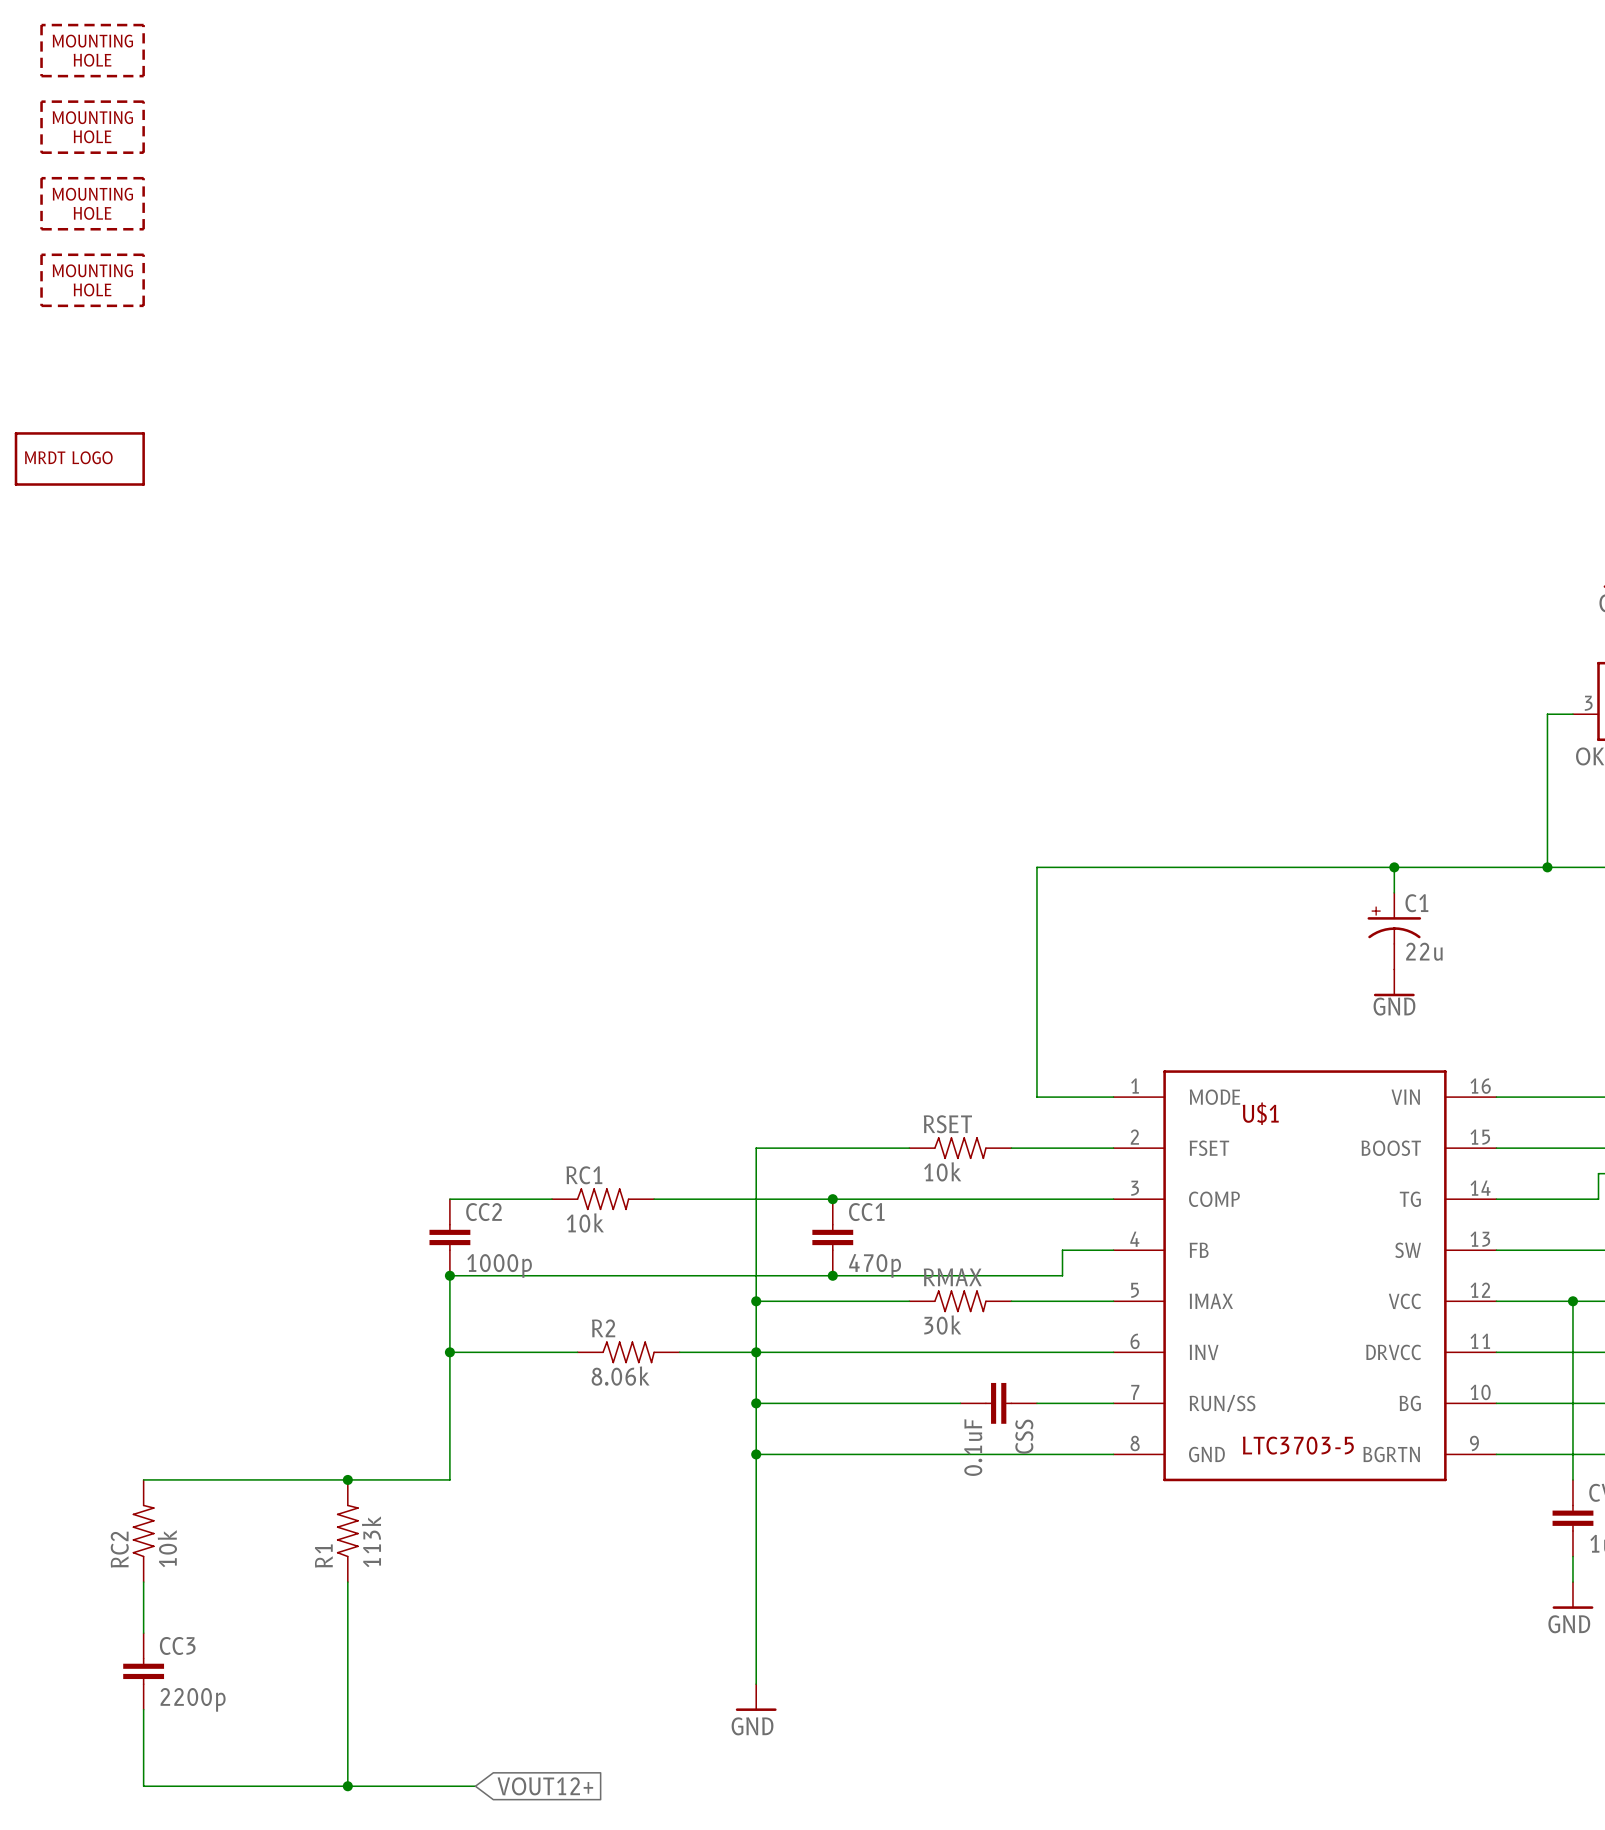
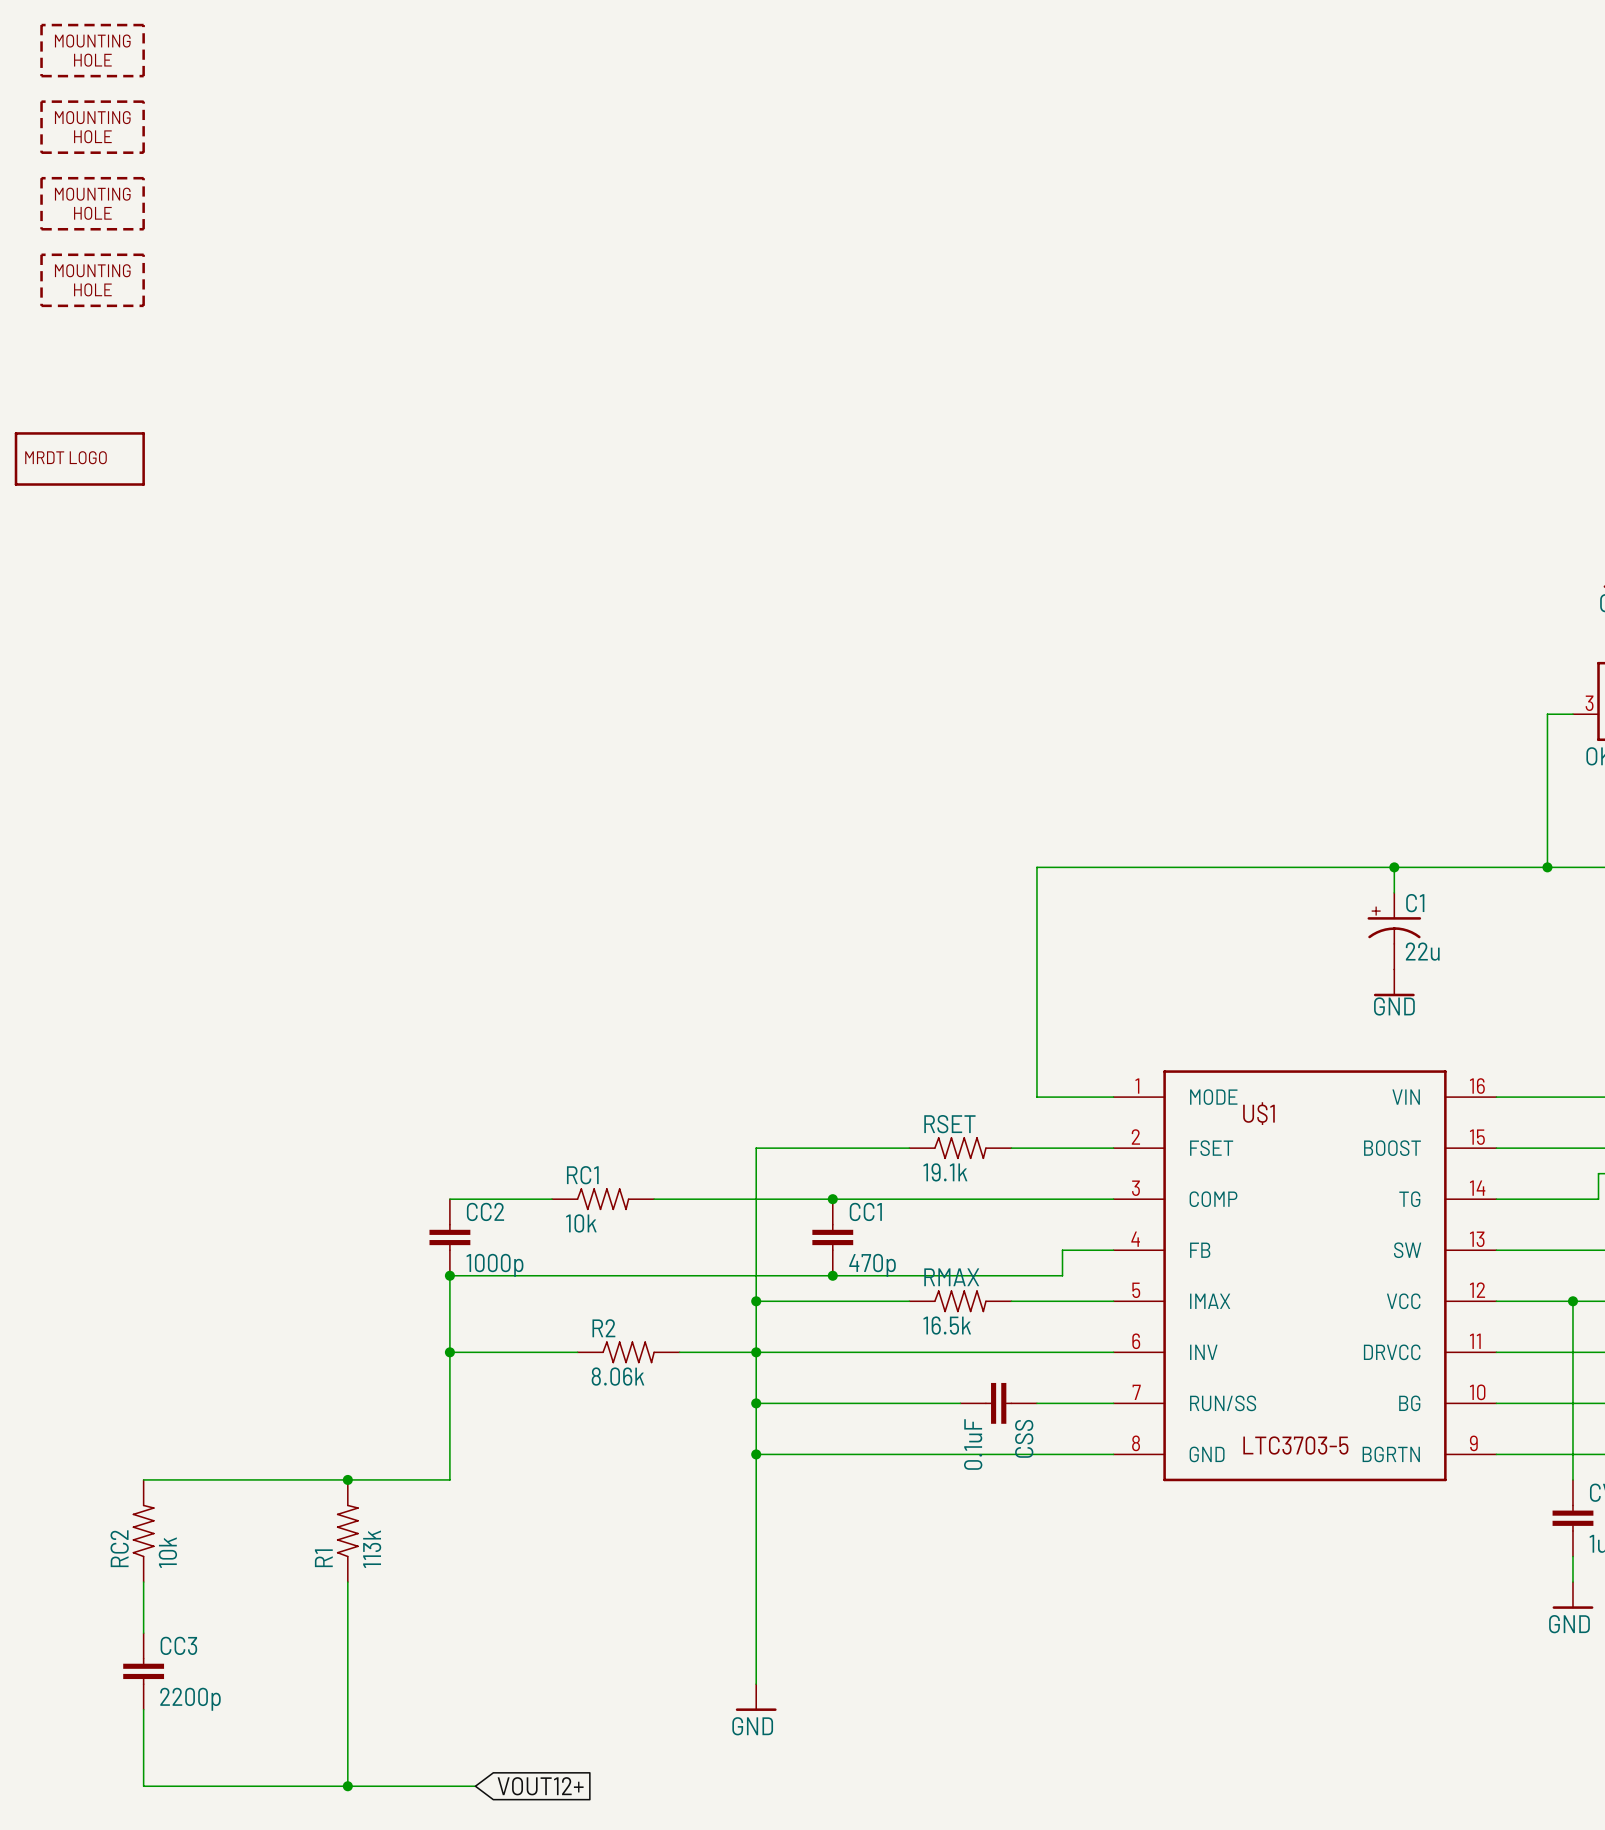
RSET value: 10k (942, 1171) -> 19.1k (945, 1172)
RMAX value: 30k (942, 1325) -> 16.5k (947, 1325)

